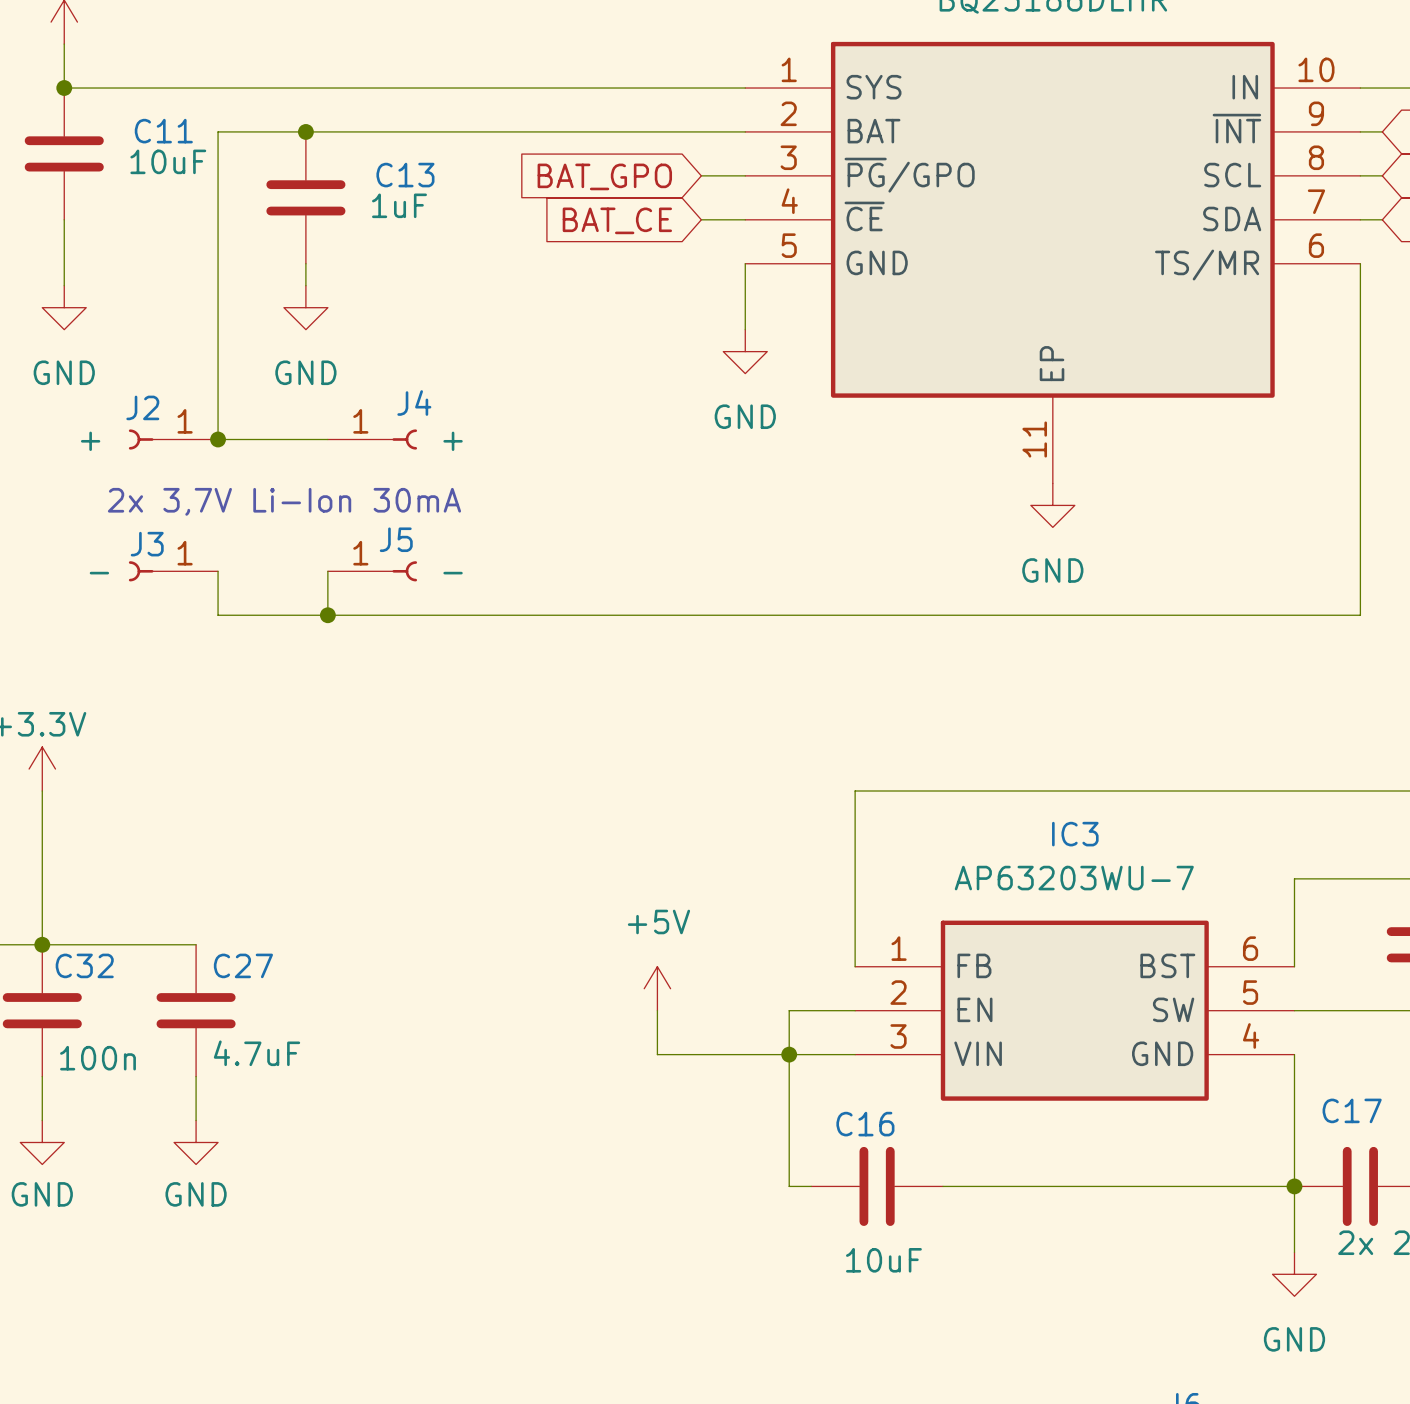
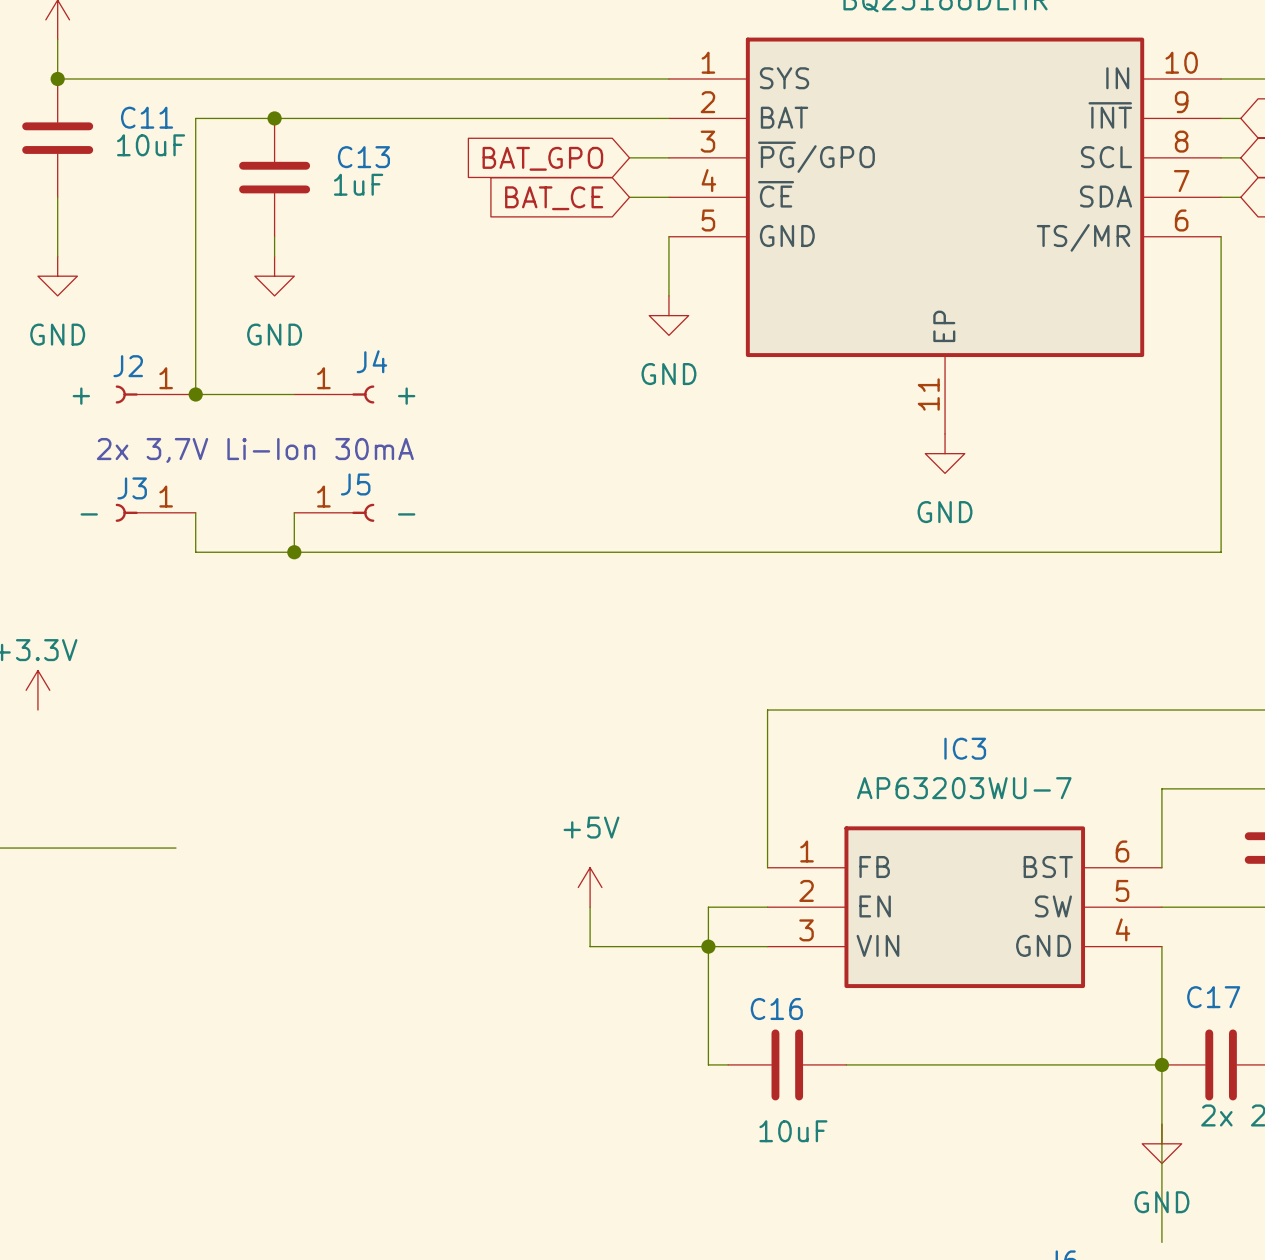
wire: (42, 790) (42, 944) -> none
junction: (42, 944) -> none
C32: 100n (42, 1010) -> none
C27: 4.7uF (196, 1010) -> none
wire: (42, 1076) (42, 1120) -> none
wire: (196, 1076) (196, 1120) -> none
power symbol: GND (42, 1142) -> none
power symbol: GND (196, 1142) -> none
wire: none -> (1161, 1124) (1161, 1242)

